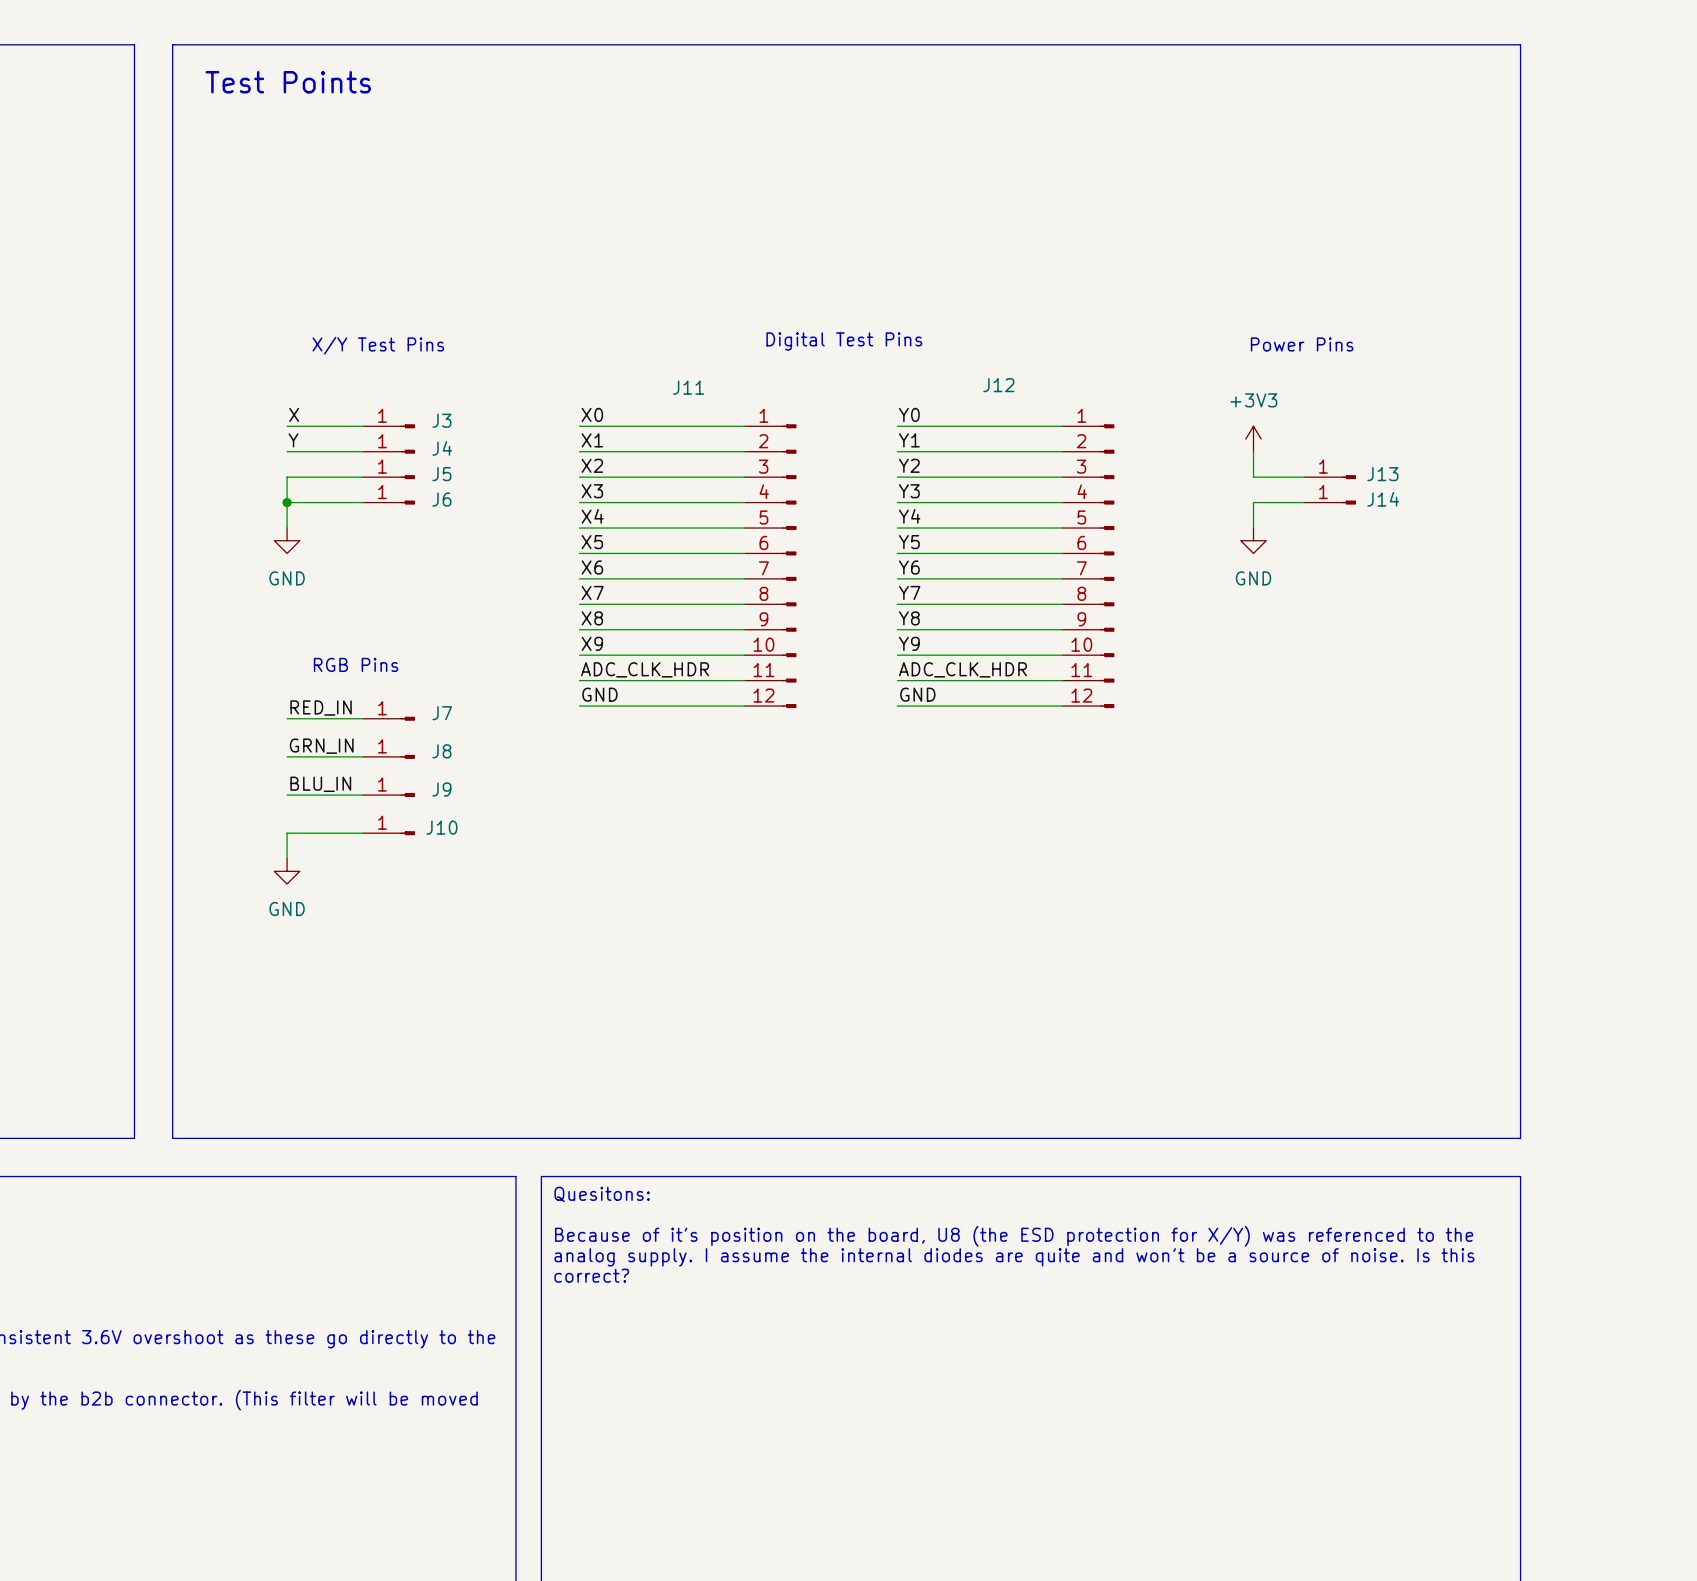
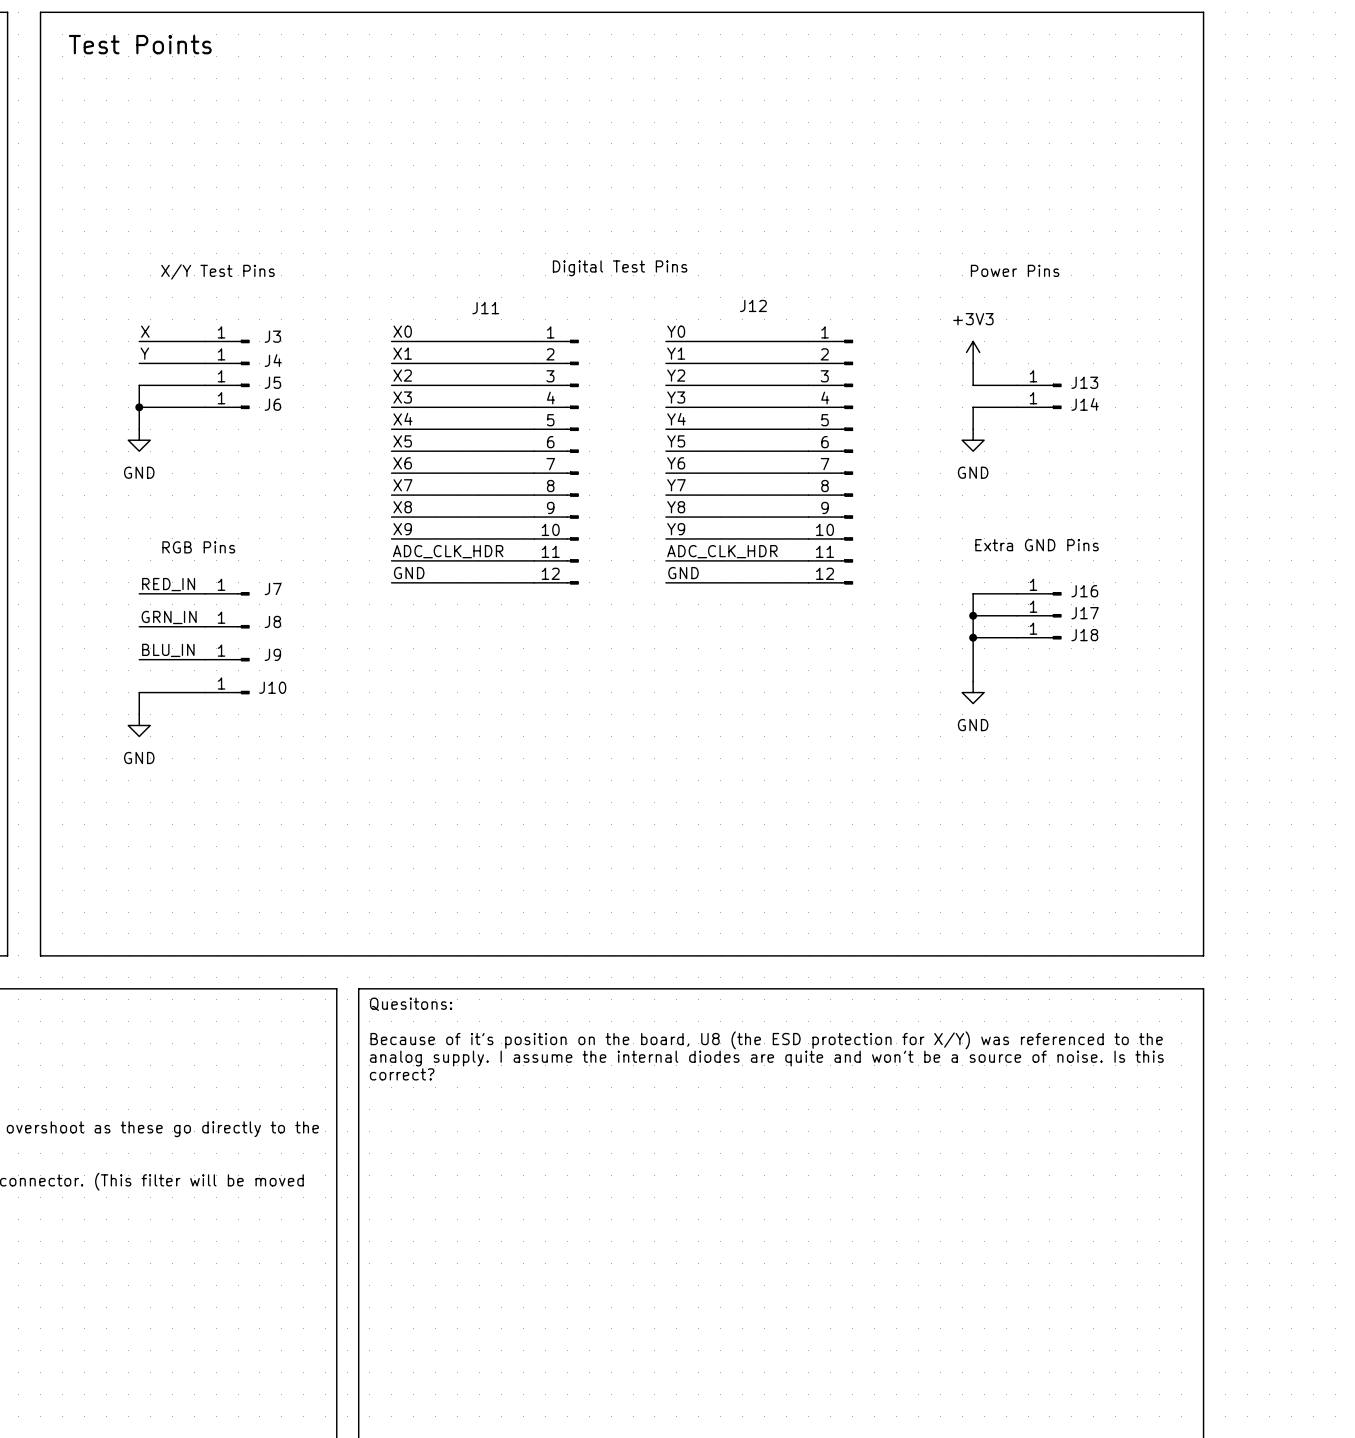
text: none -> Extra GND Pins (1037, 545)
wire: none -> (1017, 593) (973, 593) (973, 681)
J16: none -> (1039, 593)
wire: none -> (973, 615) (1017, 615)
junction: none -> (973, 615)
J17: none -> (1039, 615)
wire: none -> (973, 637) (1017, 637)
junction: none -> (973, 637)
J18: none -> (1039, 637)
power symbol: none -> GND (973, 692)

